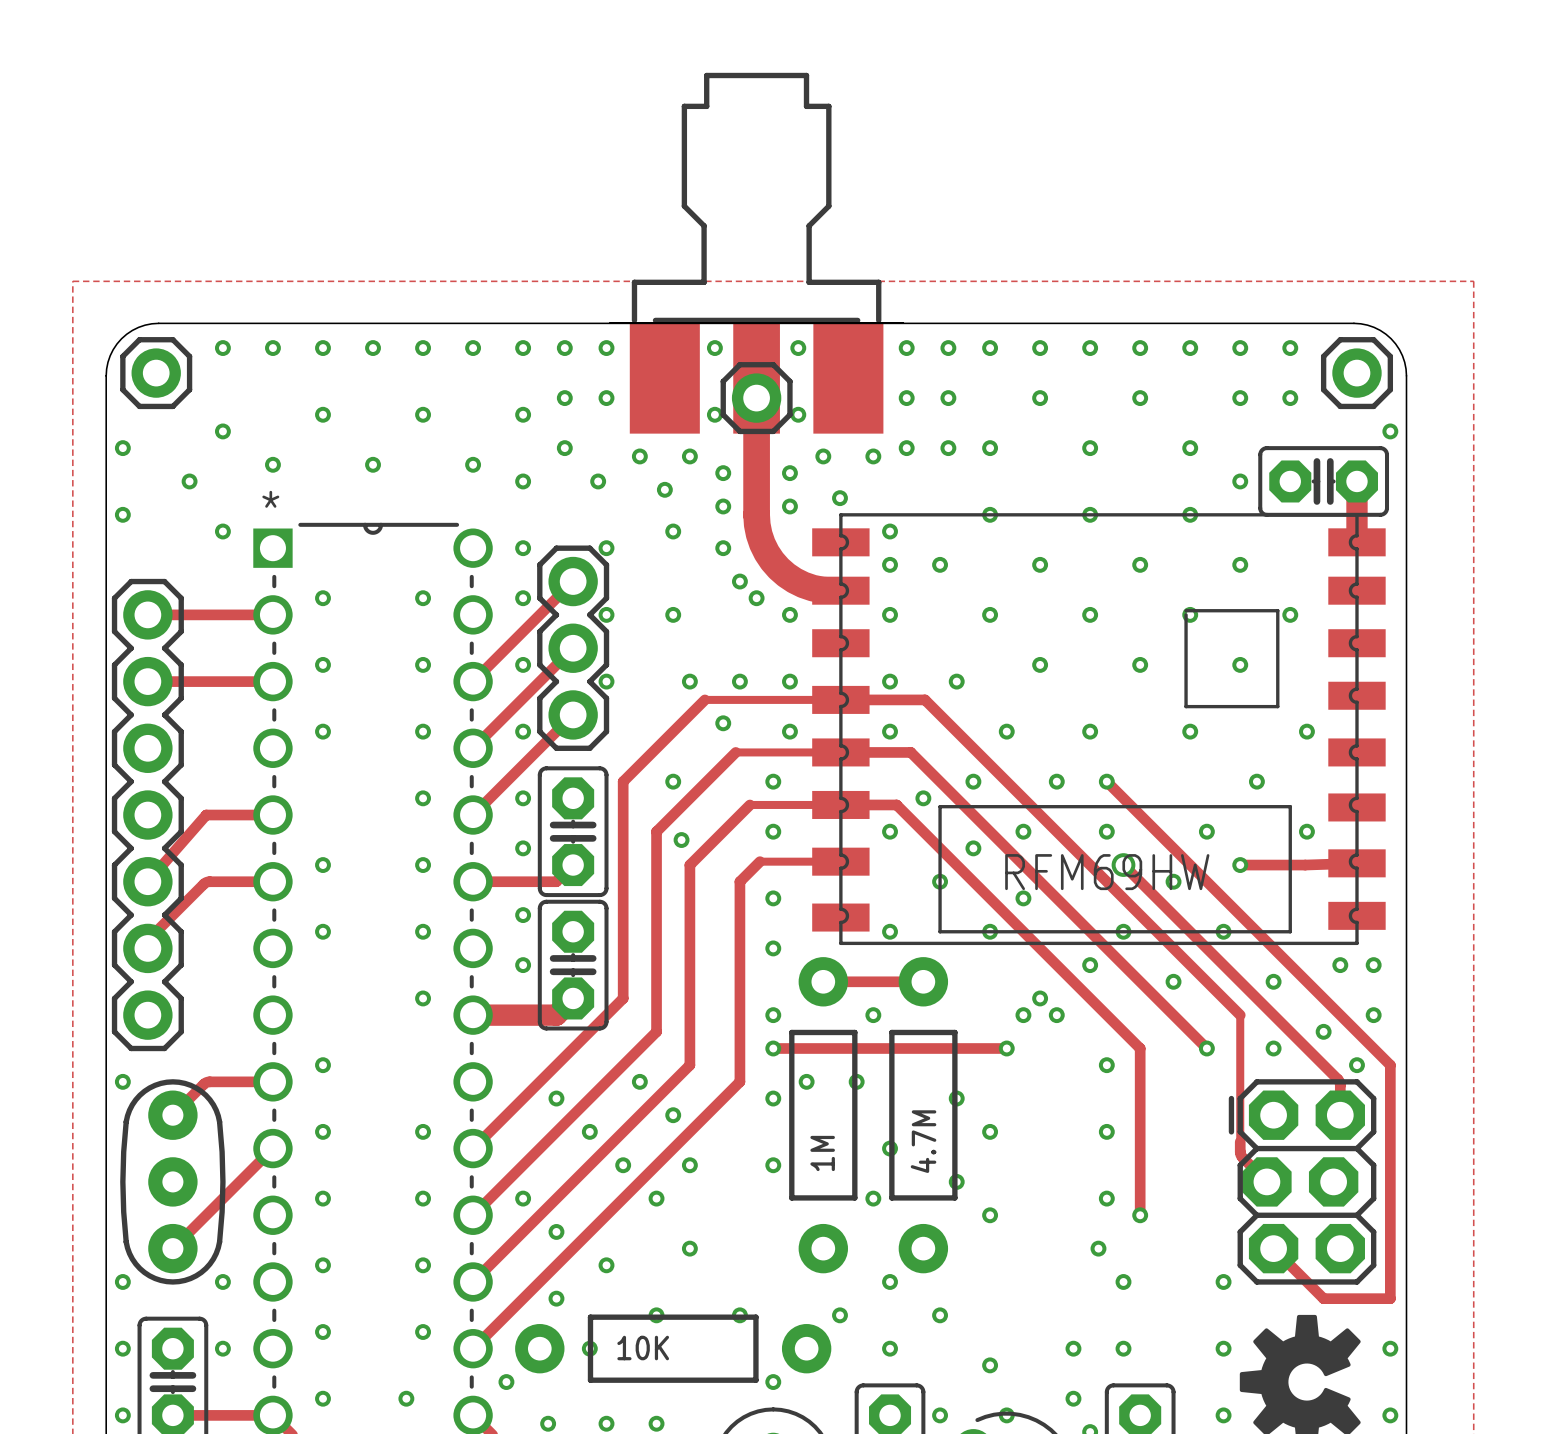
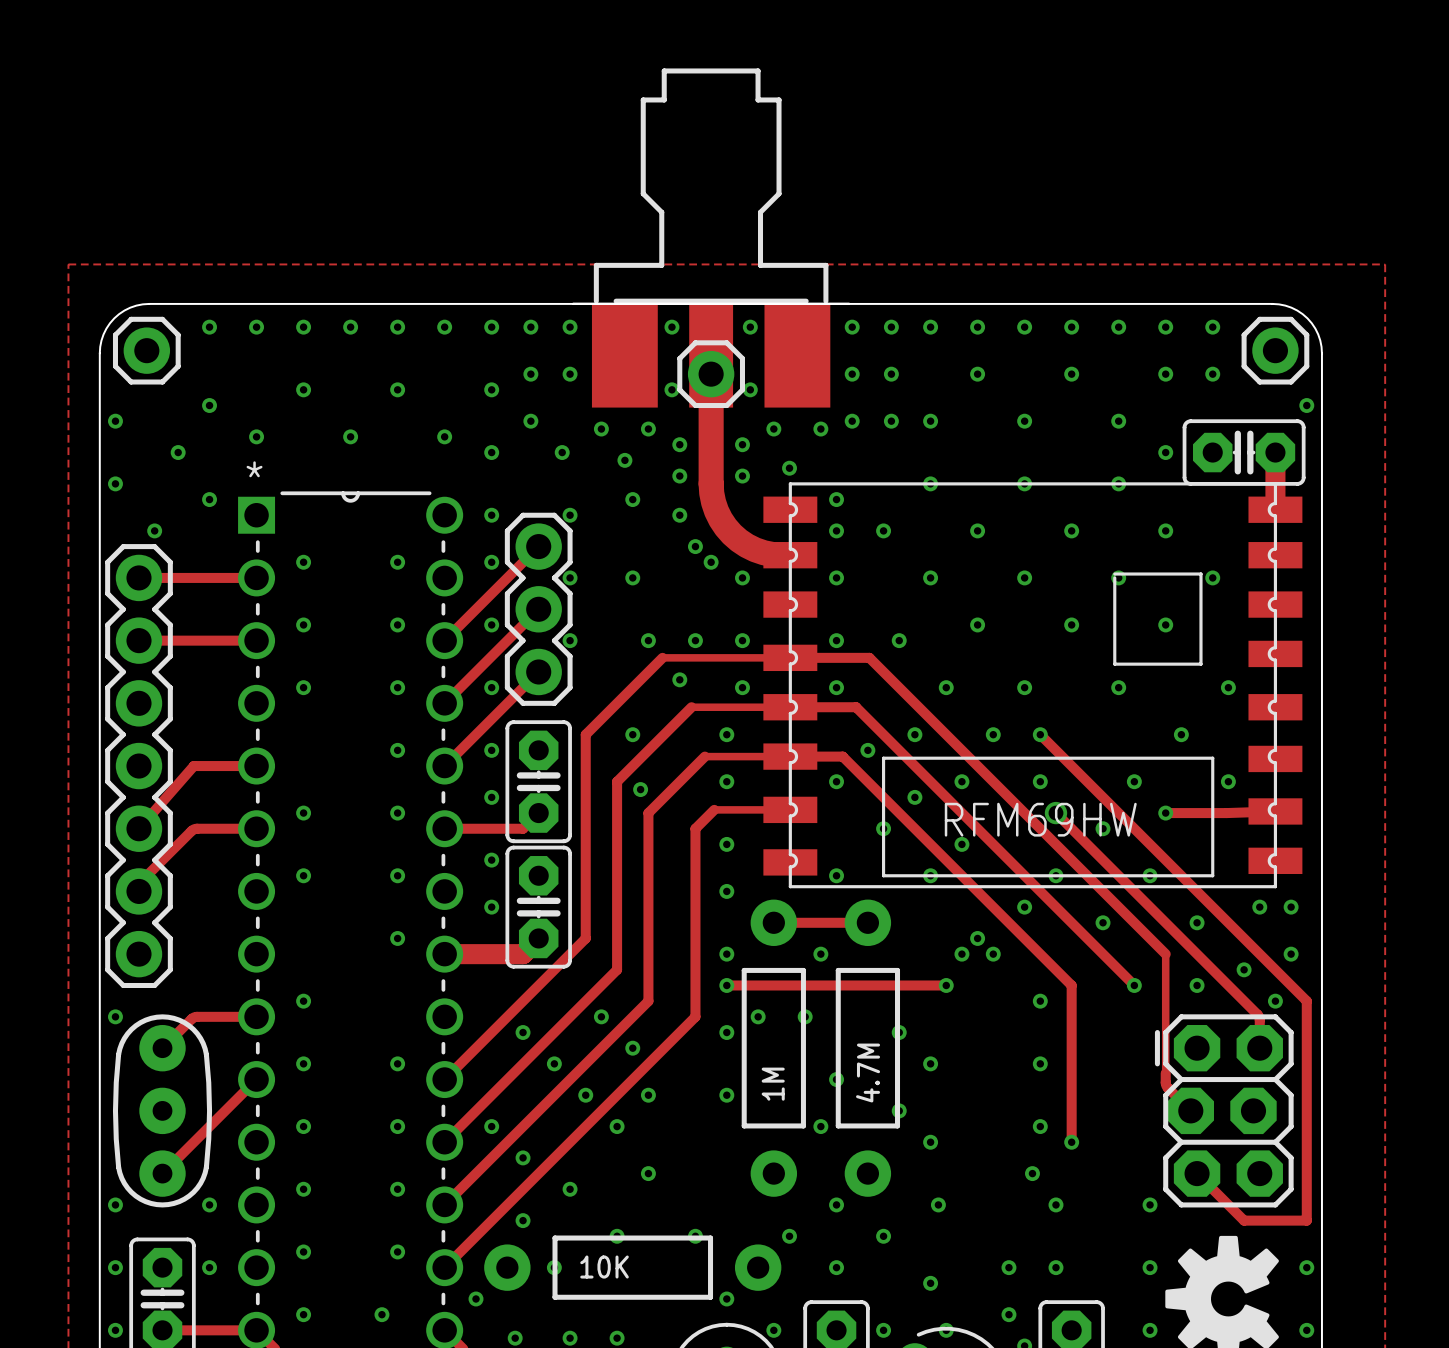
via: none -> (154, 530)
via: none -> (938, 1204)
via: none -> (773, 1330)

